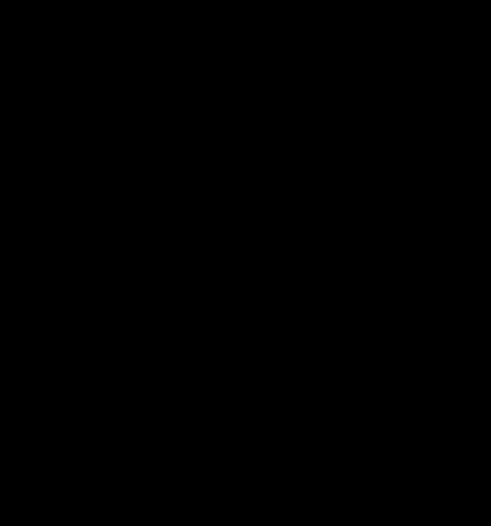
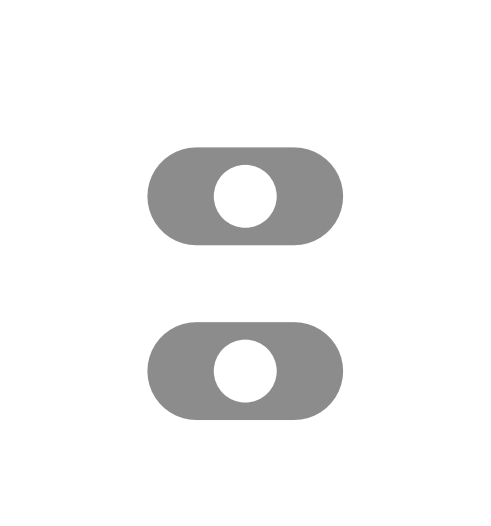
part: none -> (245, 283)

